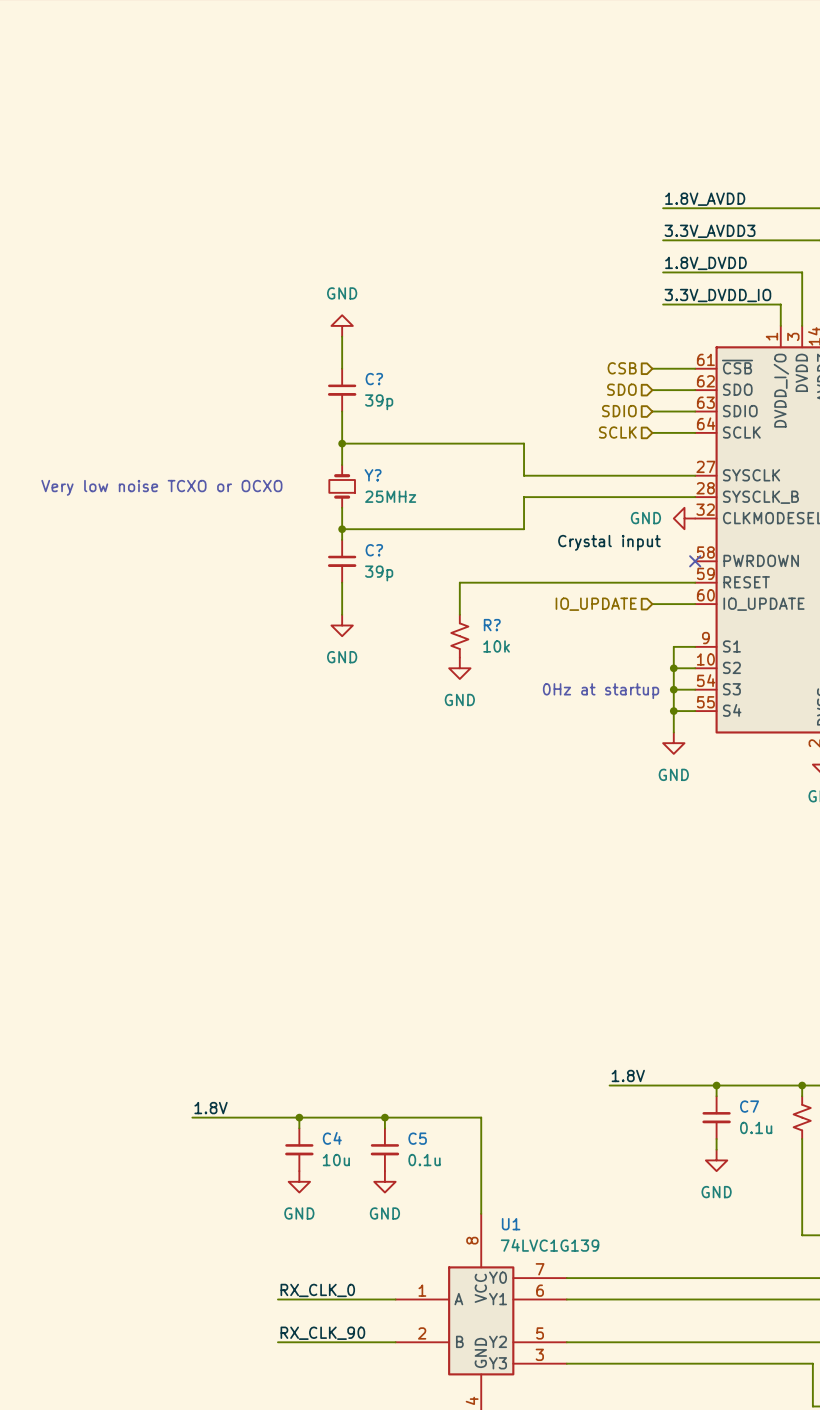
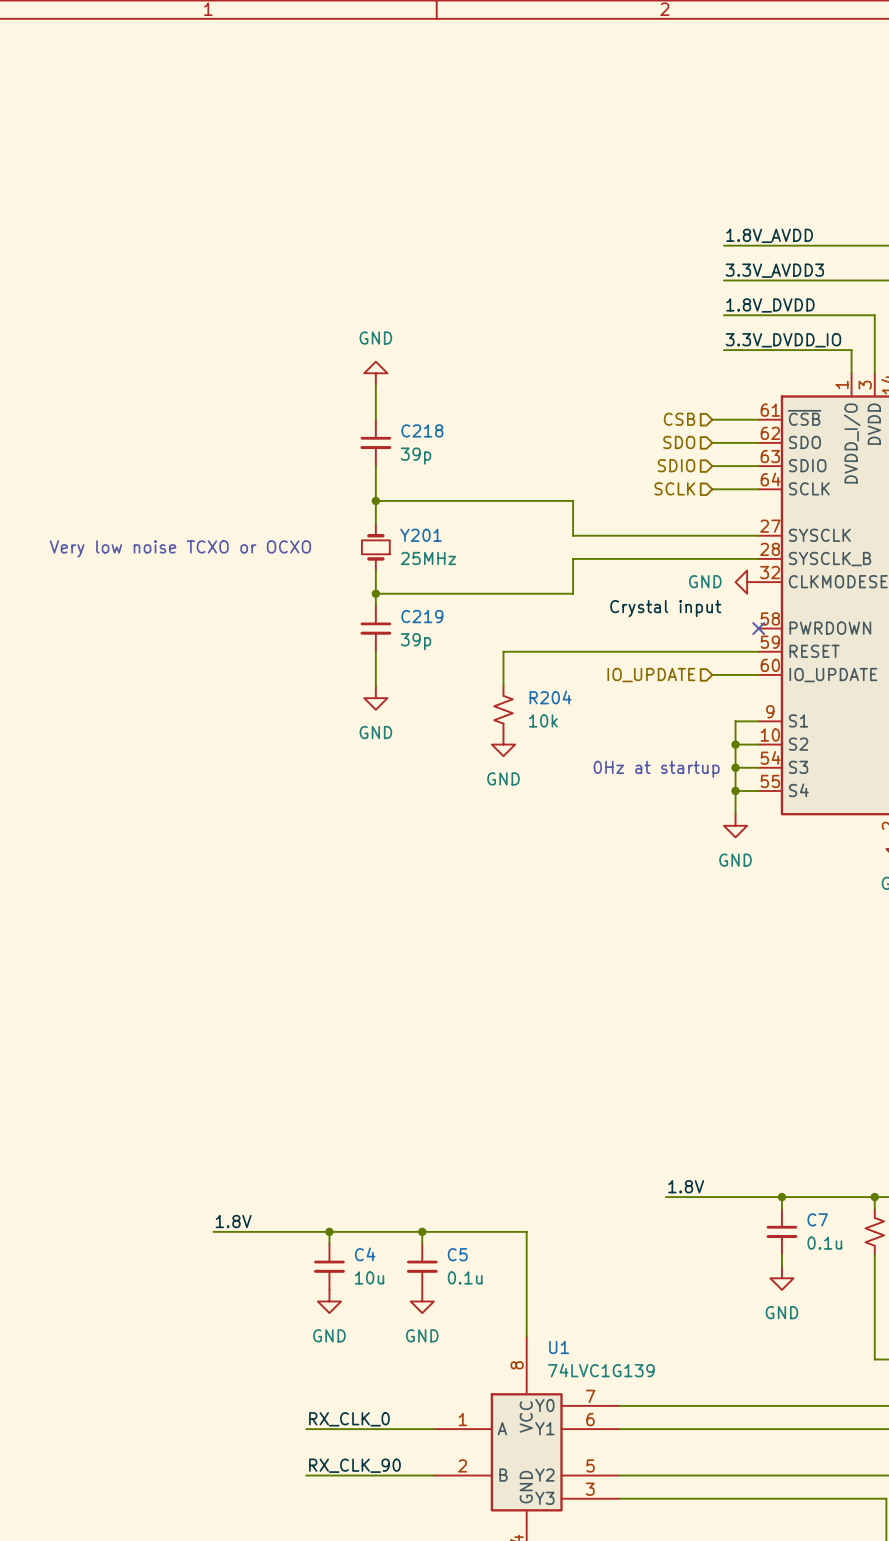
C? name: C? (374, 379) -> C218 (422, 430)
Y? name: Y? (373, 475) -> Y201 (420, 535)
C? name: C? (374, 550) -> C219 (422, 616)
R? name: R? (492, 625) -> R204 (550, 697)

